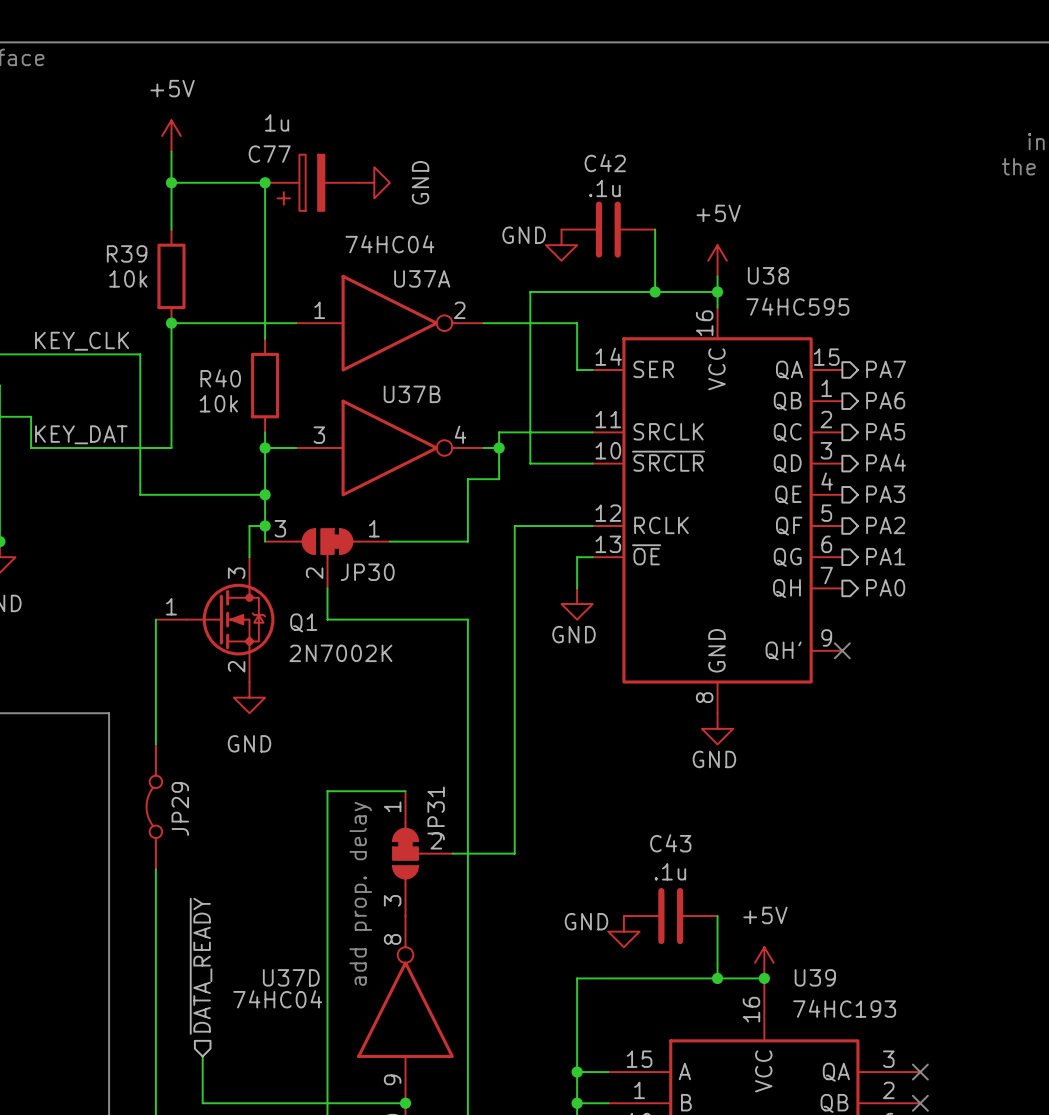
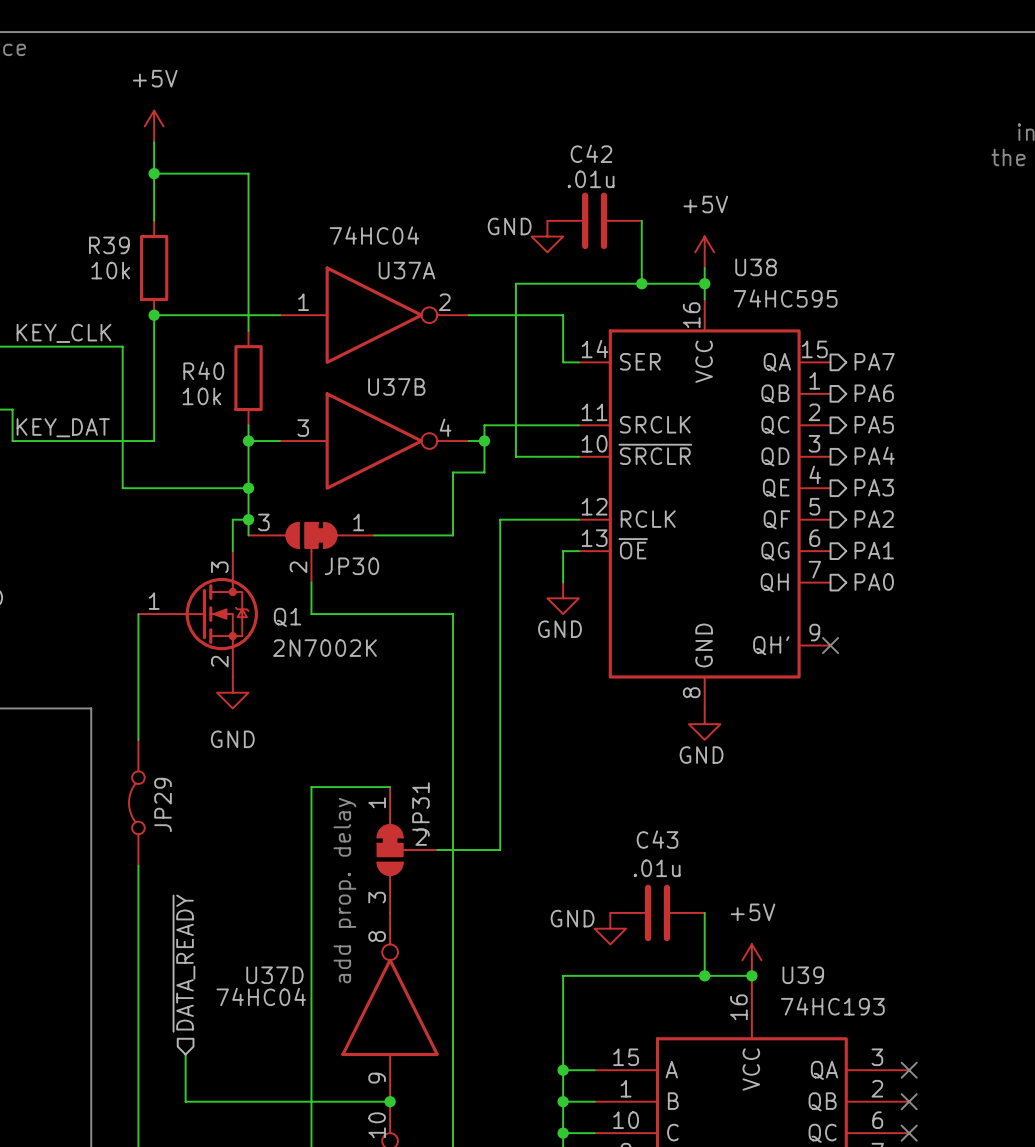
junction: (265, 182) -> none
C77: 1u (311, 182) -> none
power symbol: GND (374, 182) -> none
C42 value: .1u (604, 188) -> .01u (591, 179)
C43 value: .1u (670, 871) -> .01u (657, 868)

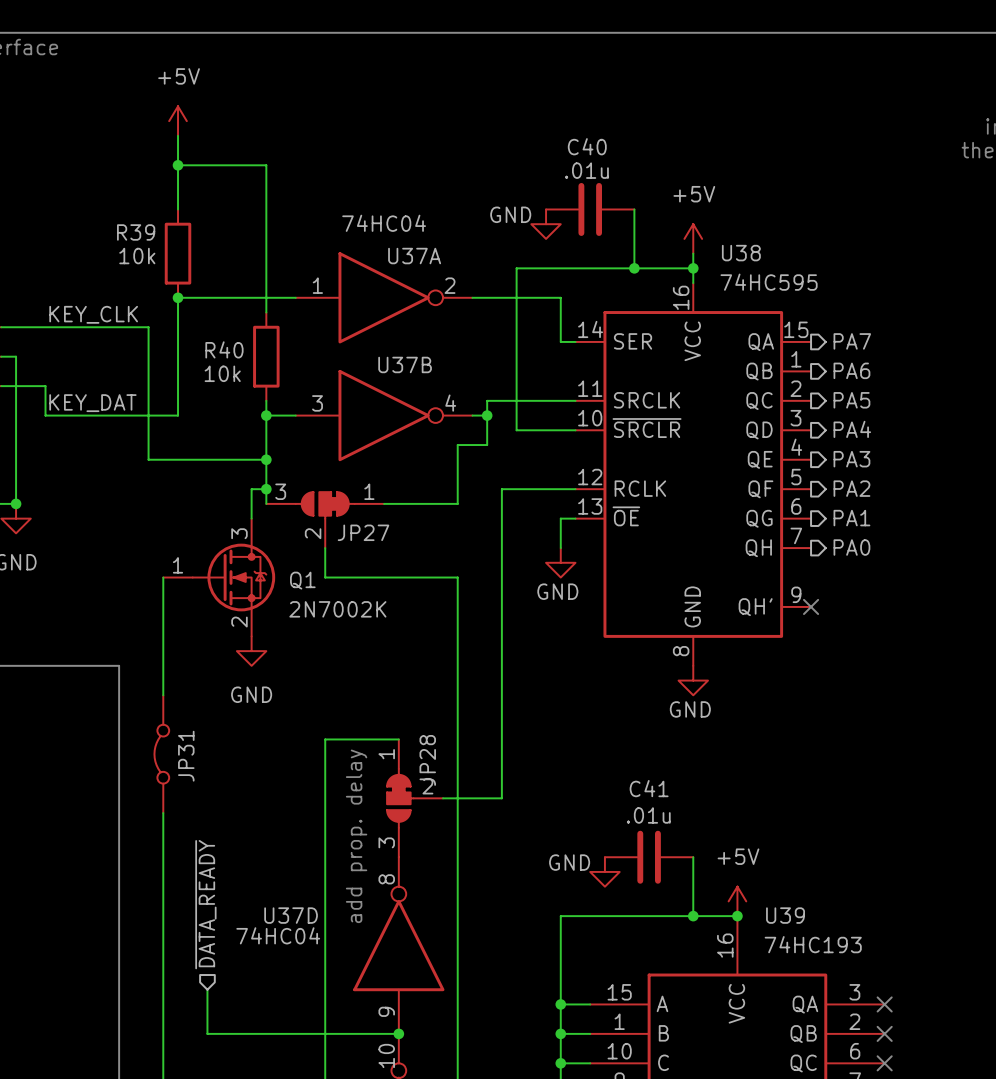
C42 name: C42 (591, 153) -> C40 (587, 146)
JP30 name: JP30 (351, 566) -> JP27 (363, 532)
JP29 name: JP29 (163, 804) -> JP31 (186, 756)
JP31 name: JP31 (420, 809) -> JP28 (427, 760)
C43 name: C43 (657, 839) -> C41 (649, 788)

